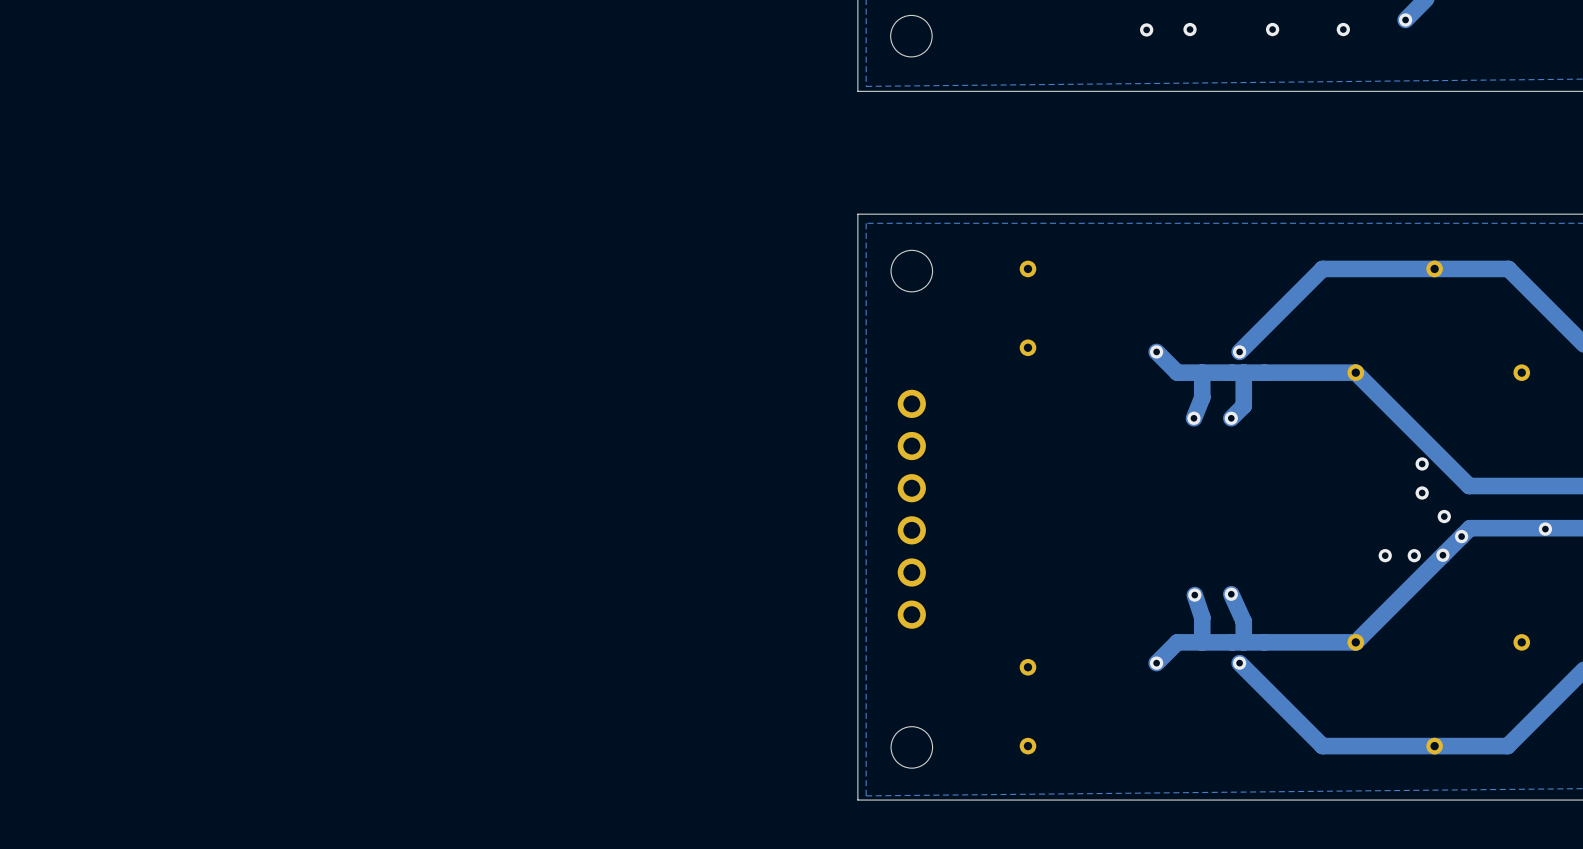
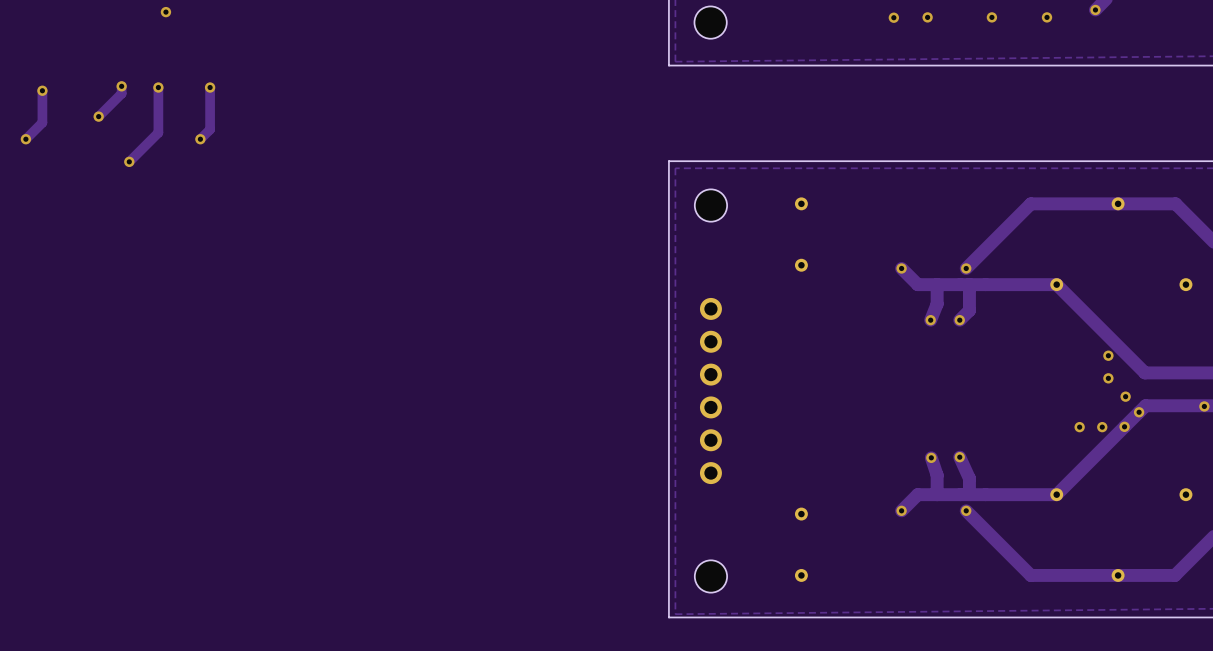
via: none -> (165, 12)
track: none -> (121, 86) (121, 93) (98, 116)
via: none -> (121, 86)
track: none -> (158, 87) (158, 132) (129, 161)
via: none -> (158, 87)
track: none -> (210, 87) (210, 129) (200, 139)
via: none -> (210, 87)
track: none -> (42, 90) (42, 122) (25, 139)
via: none -> (42, 90)
via: none -> (98, 116)
via: none -> (25, 139)
via: none -> (200, 139)
via: none -> (129, 161)

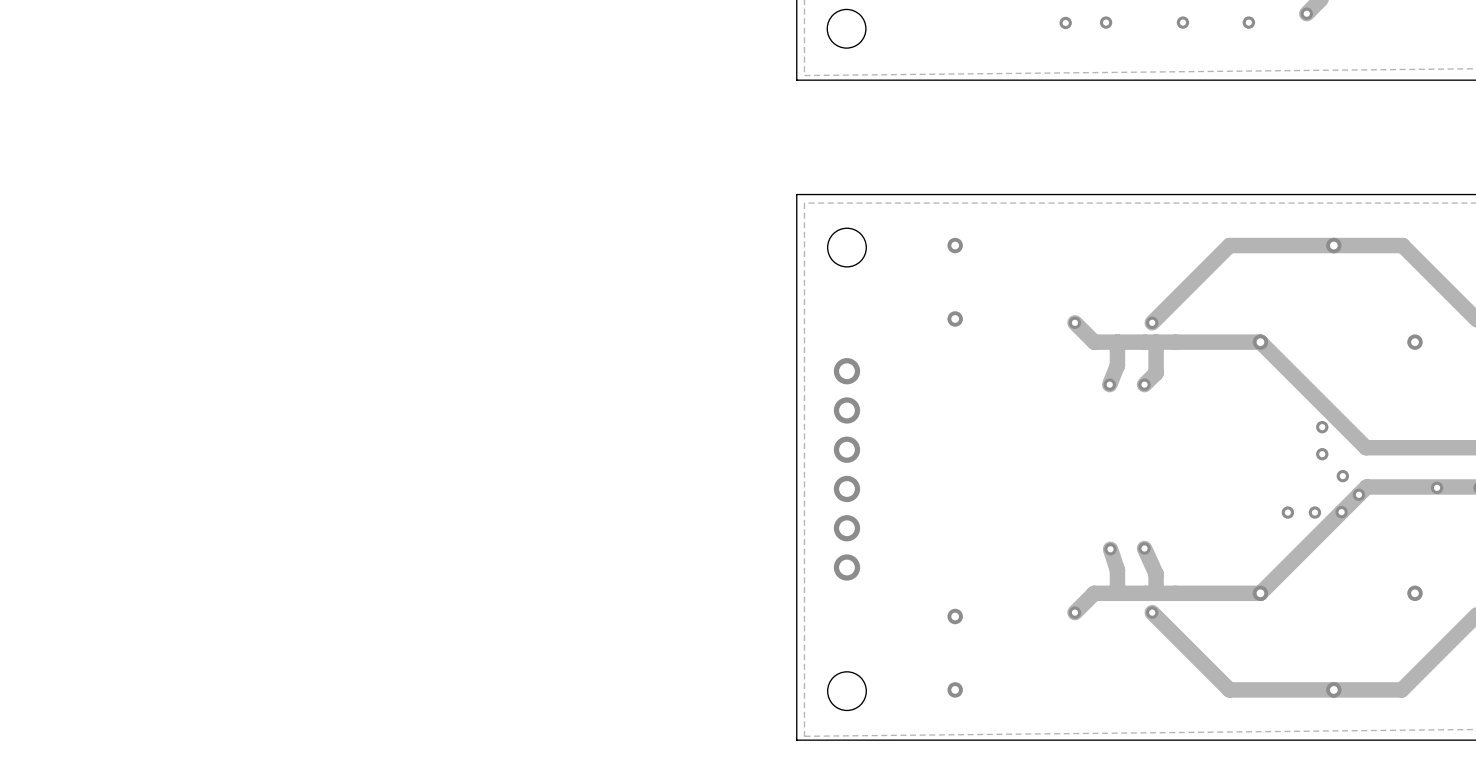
via: (165, 12) -> none
track: (121, 86) (121, 93) (98, 116) -> none
via: (121, 86) -> none
track: (158, 87) (158, 132) (129, 161) -> none
via: (158, 87) -> none
track: (210, 87) (210, 129) (200, 139) -> none
via: (210, 87) -> none
track: (42, 90) (42, 122) (25, 139) -> none
via: (42, 90) -> none
via: (98, 116) -> none
via: (25, 139) -> none
via: (200, 139) -> none
via: (129, 161) -> none

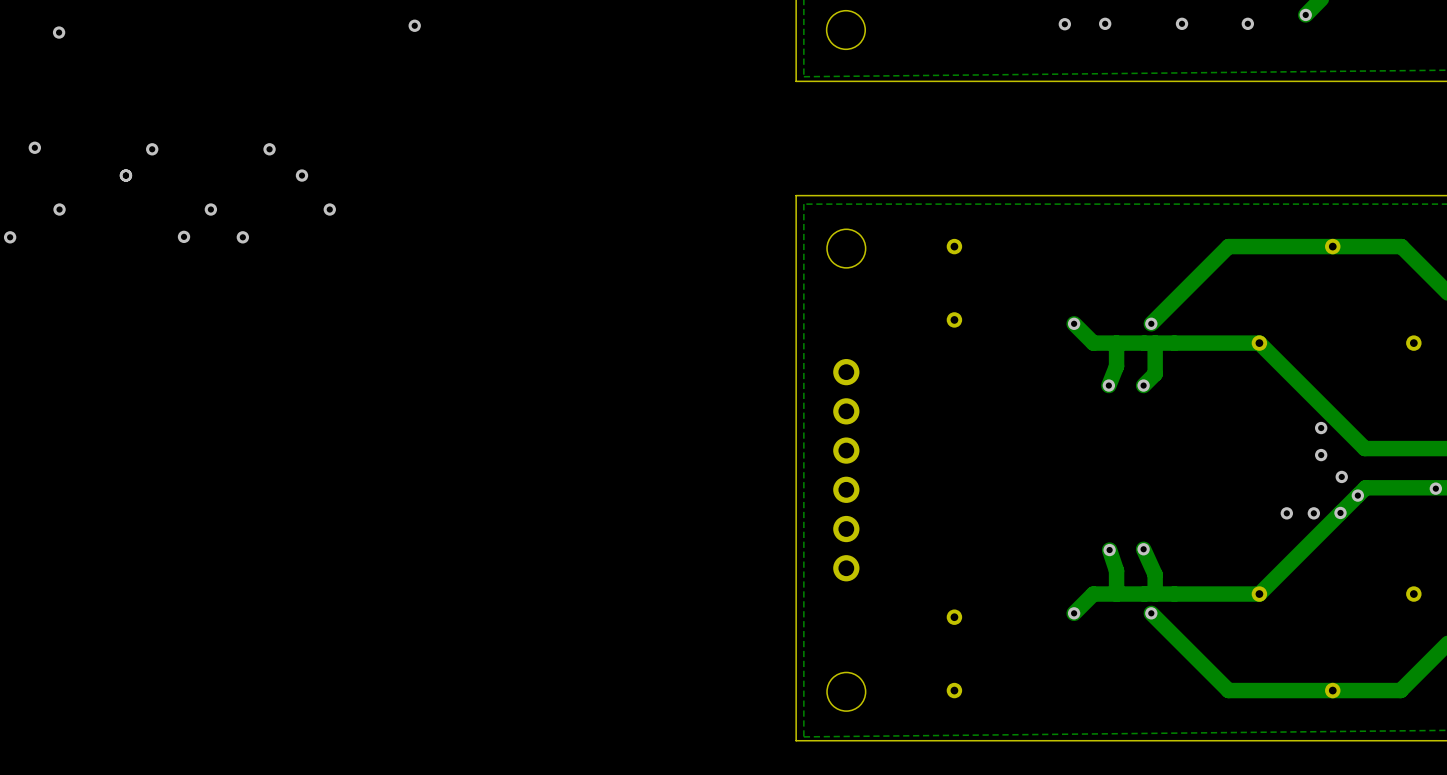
via: none -> (414, 25)
via: none -> (59, 32)
via: none -> (34, 147)
via: none -> (152, 149)
via: none -> (269, 149)
via: none -> (125, 175)
via: none -> (301, 175)
via: none -> (59, 209)
via: none -> (210, 209)
via: none -> (329, 209)
via: none -> (184, 236)
via: none -> (10, 237)
via: none -> (242, 237)

